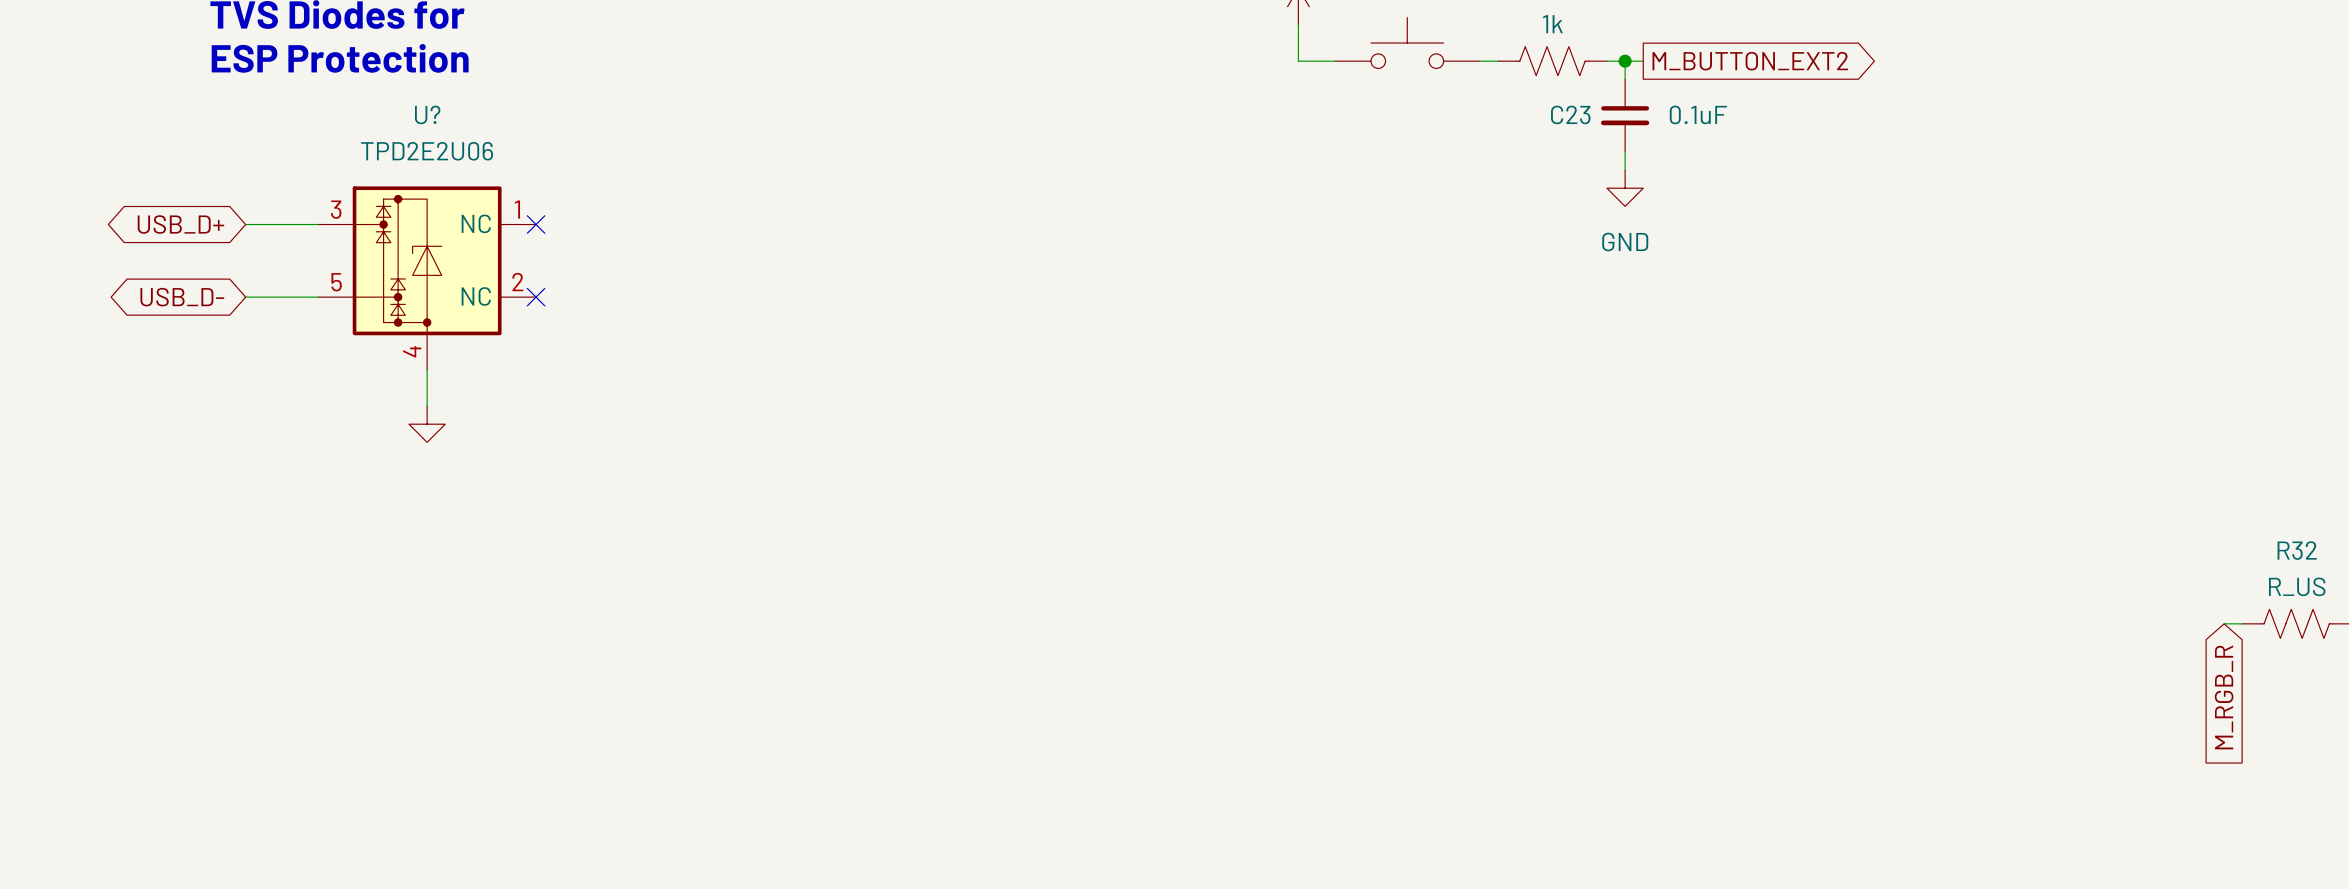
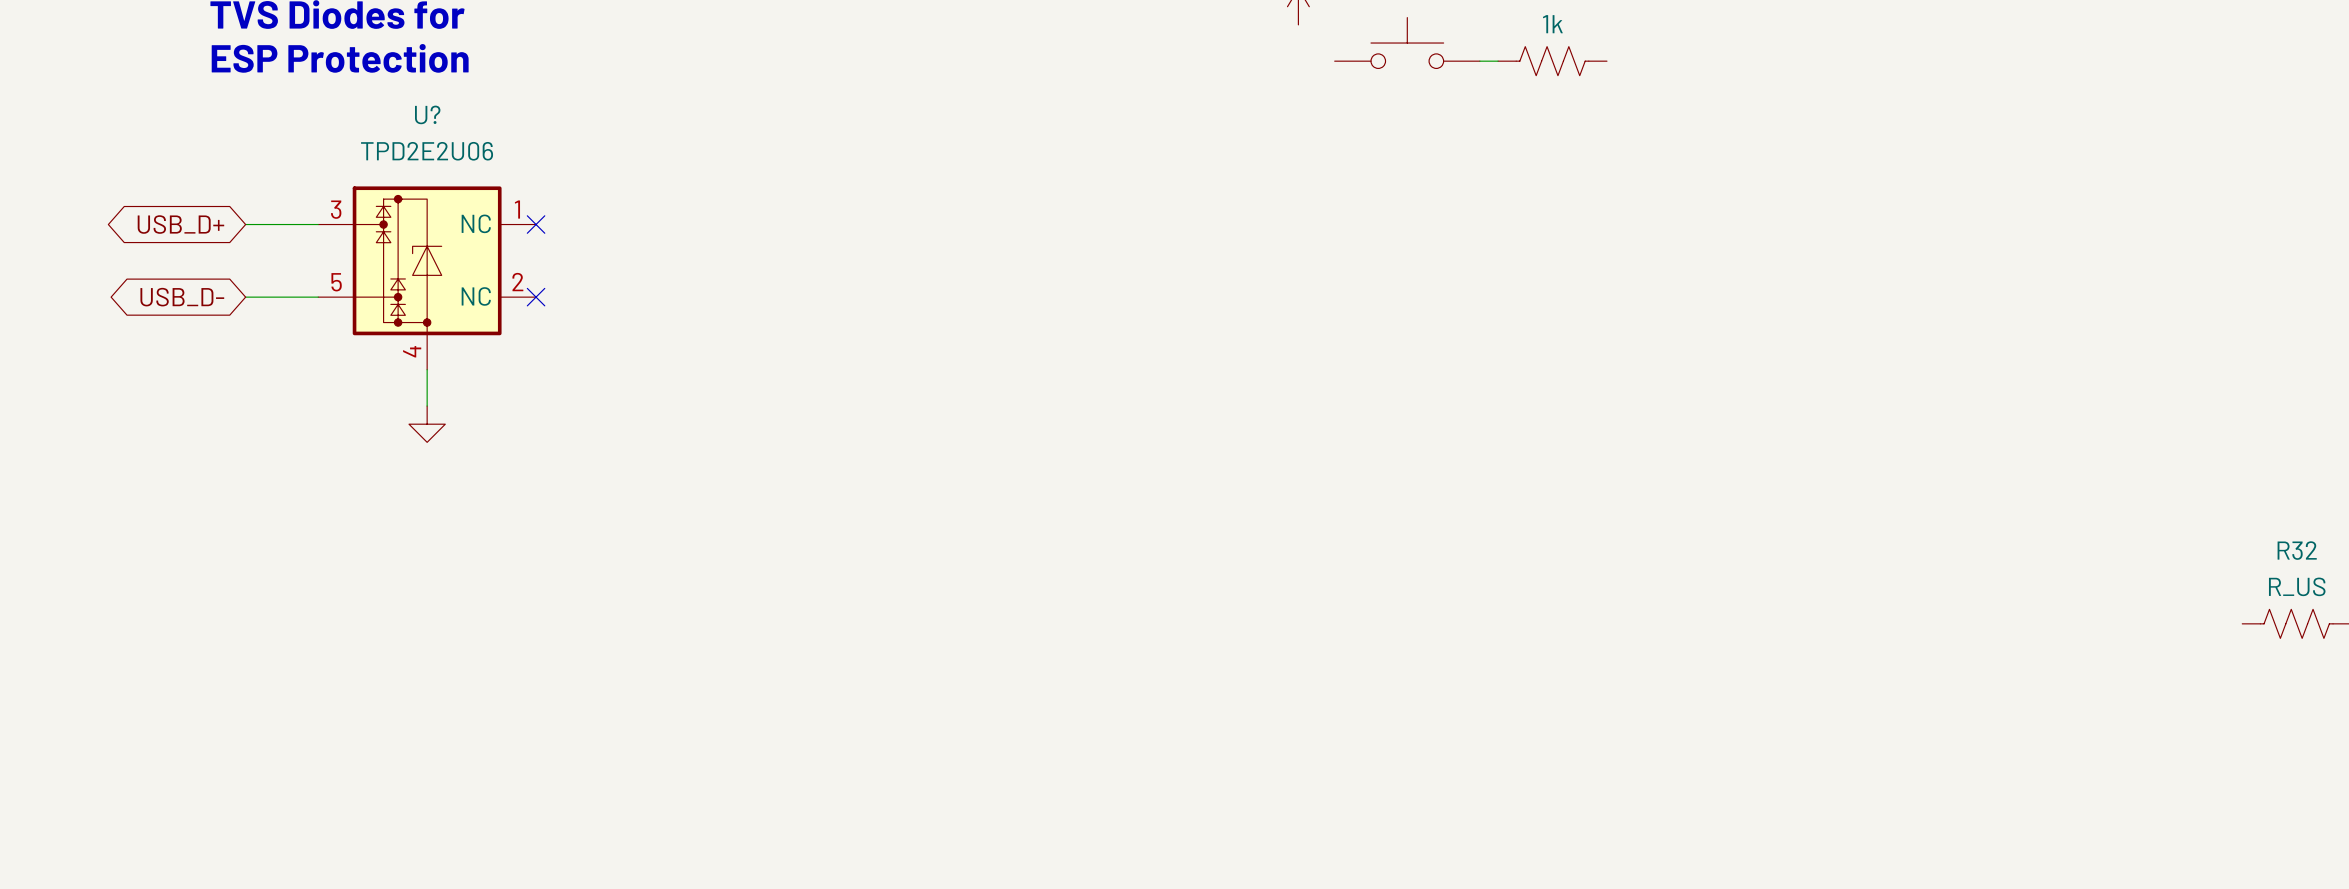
wire: (1298, 24) (1298, 61) (1334, 61) -> none
wire: (1606, 61) (1643, 61) -> none
wire: (1625, 61) (1625, 79) -> none
junction: (1625, 61) -> none
global label: M_BUTTON_EXT2 (1750, 61) -> none
C23: 0.1uF (1625, 115) -> none
wire: (1625, 151) (1625, 170) -> none
power symbol: GND (1625, 188) -> none
wire: (2224, 623) (2242, 623) -> none
global label: M_RGB_R (2224, 697) -> none

